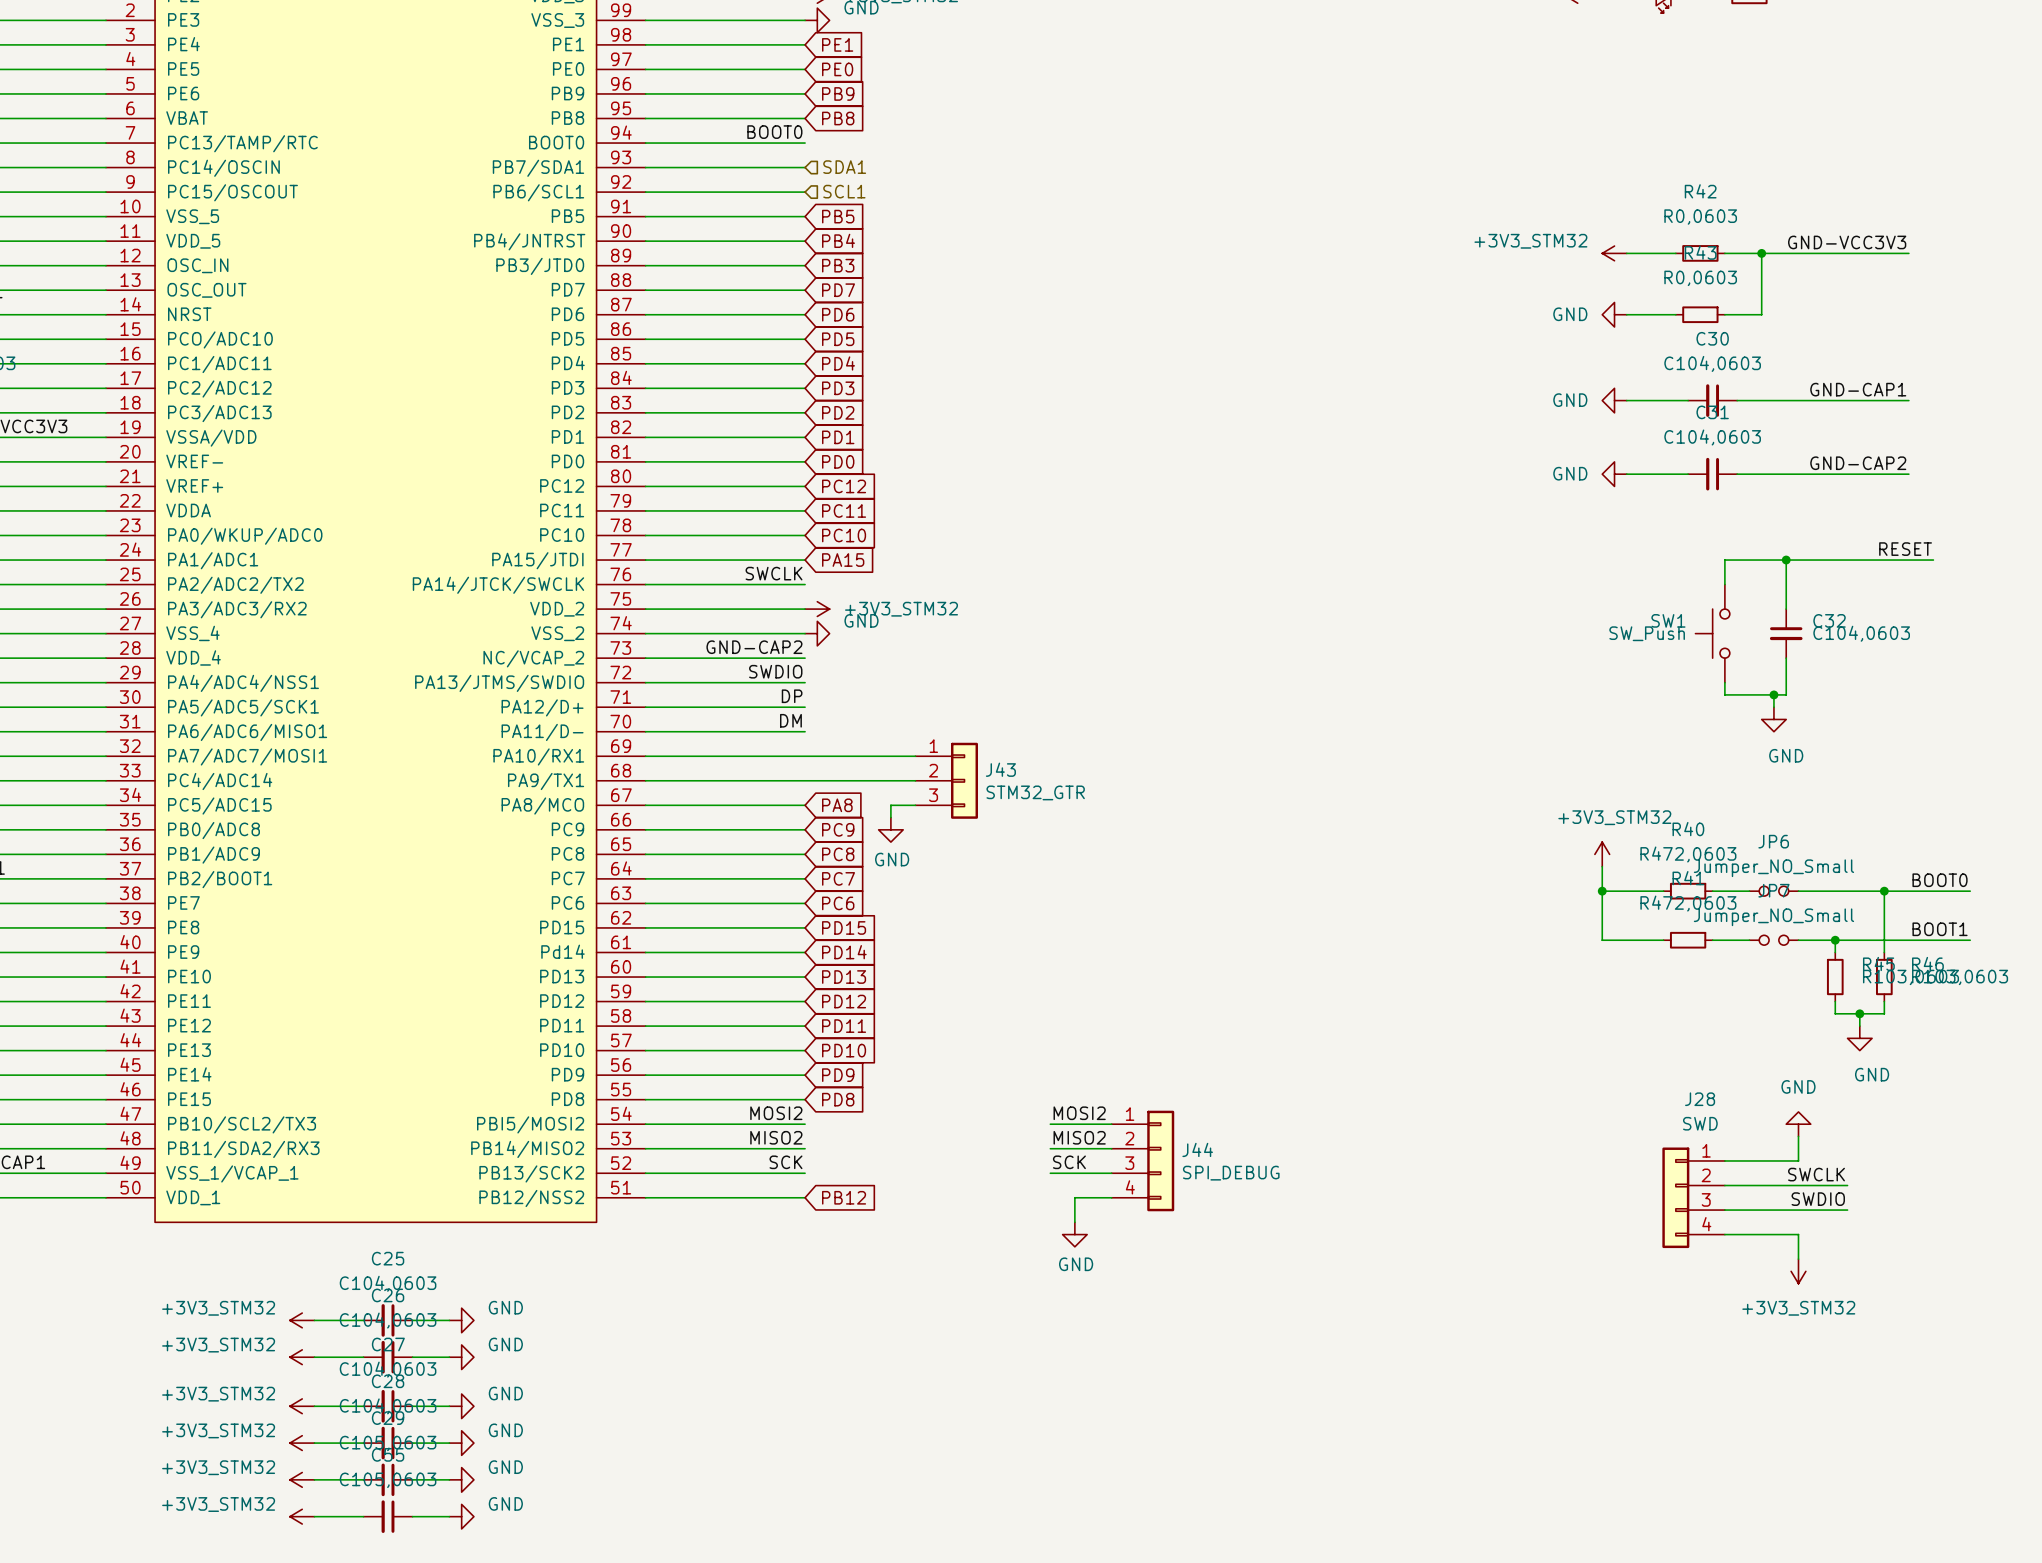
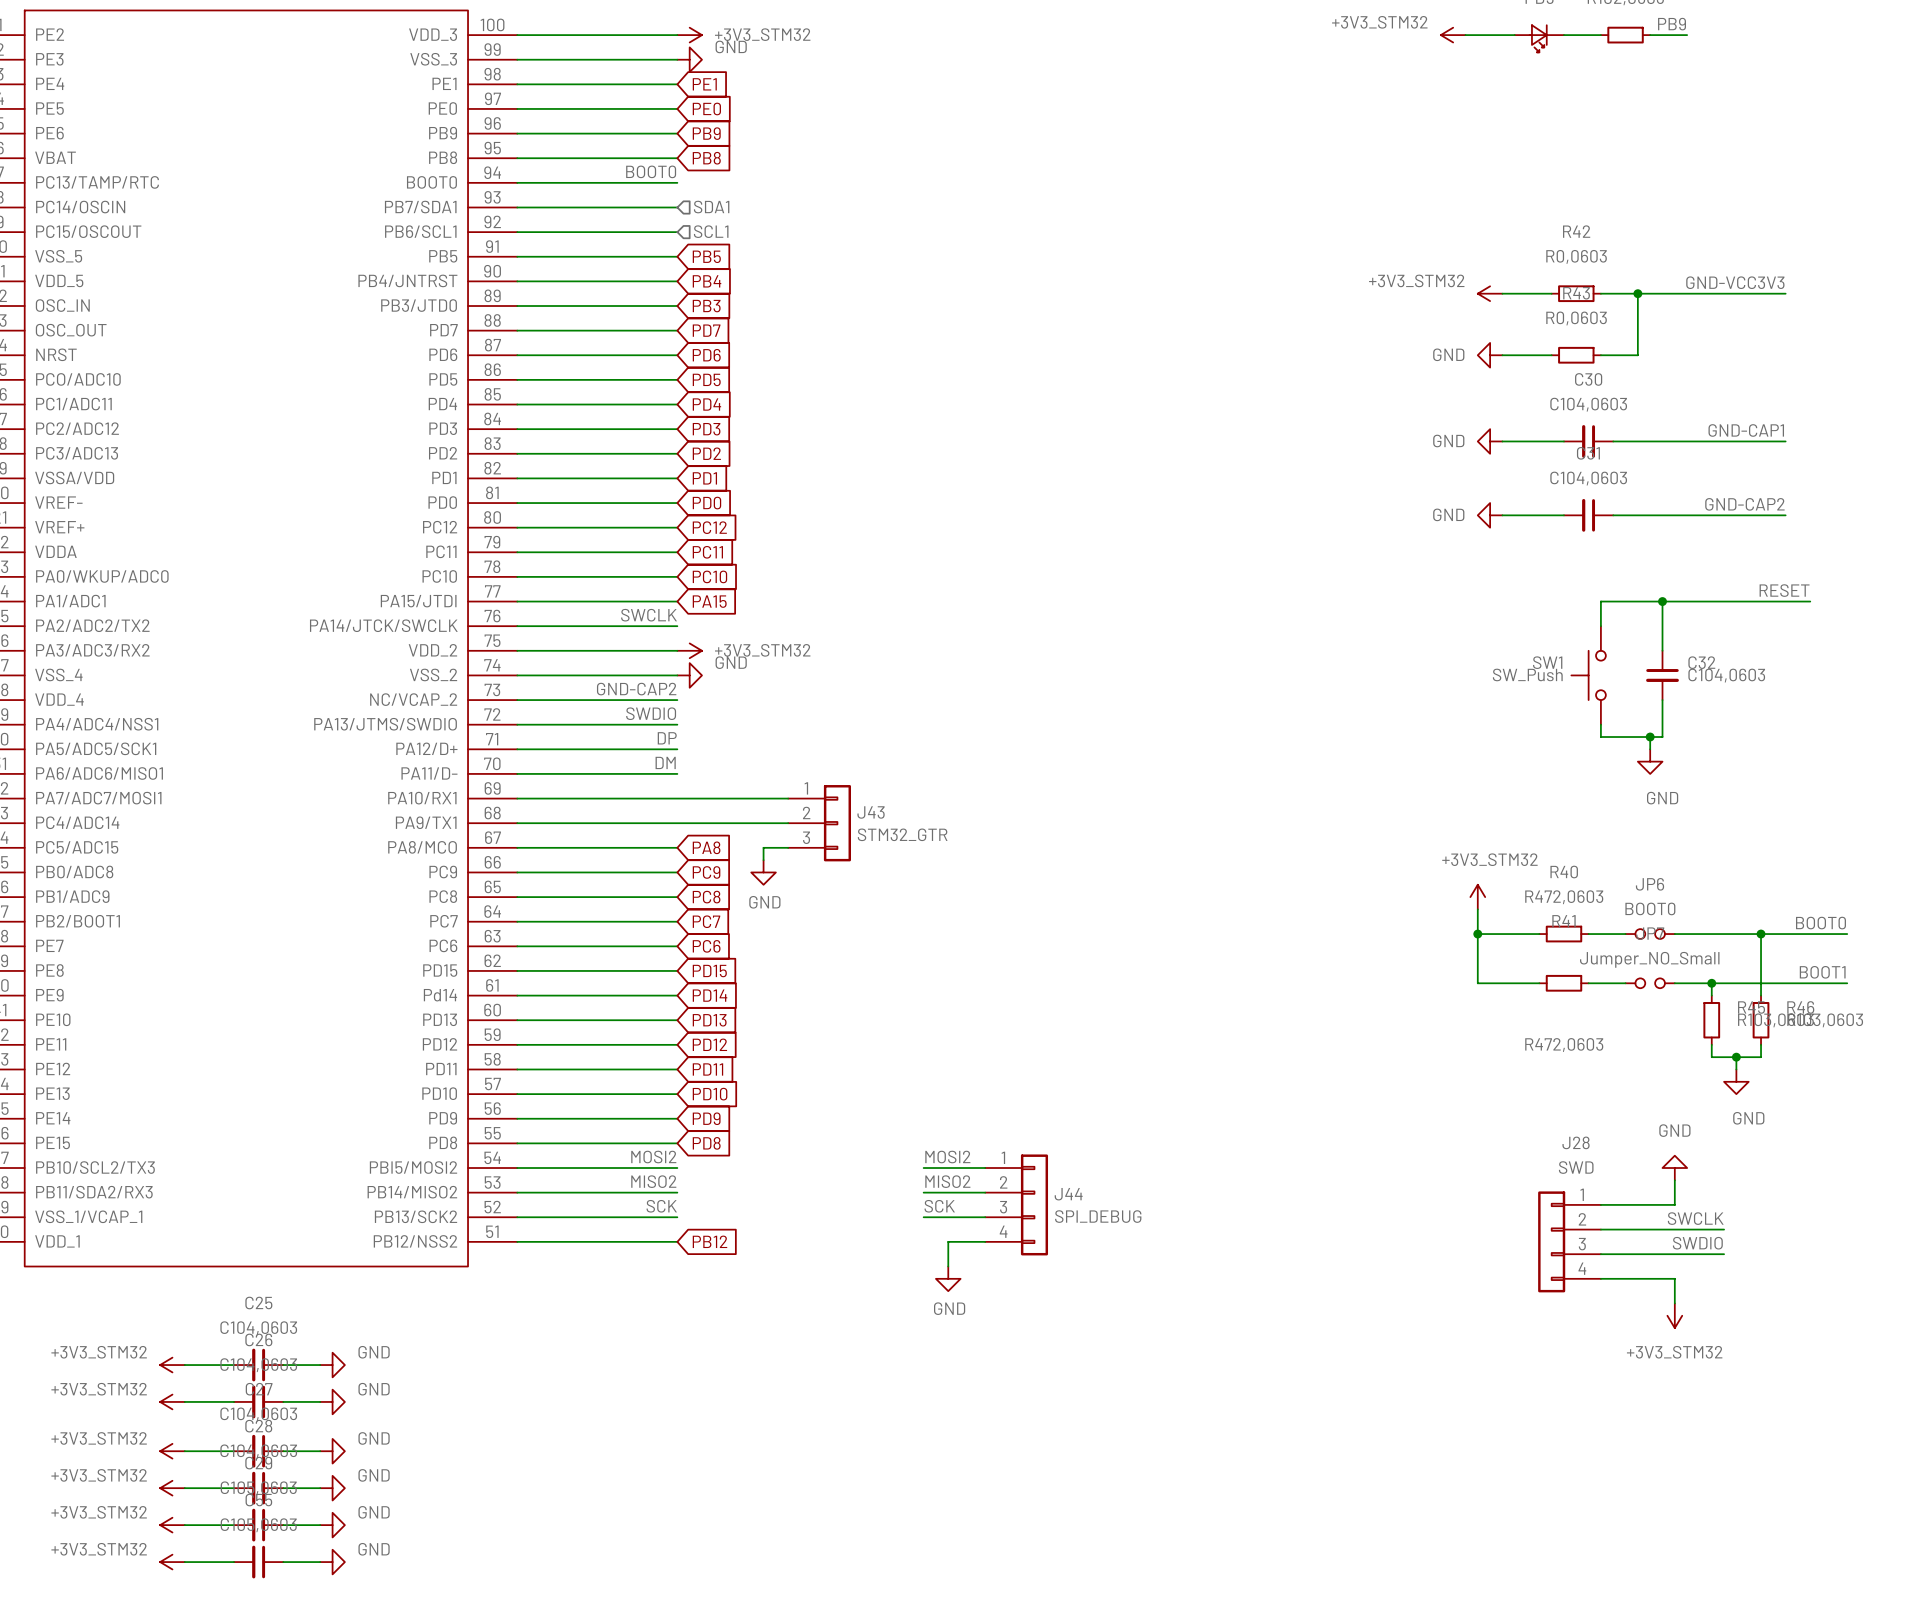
JP6 value: Jumper_NO_Small (1773, 868) -> BOOT0 (1650, 908)
R41 value position: R472,0603 (1688, 903) -> R472,0603 (1564, 1045)

